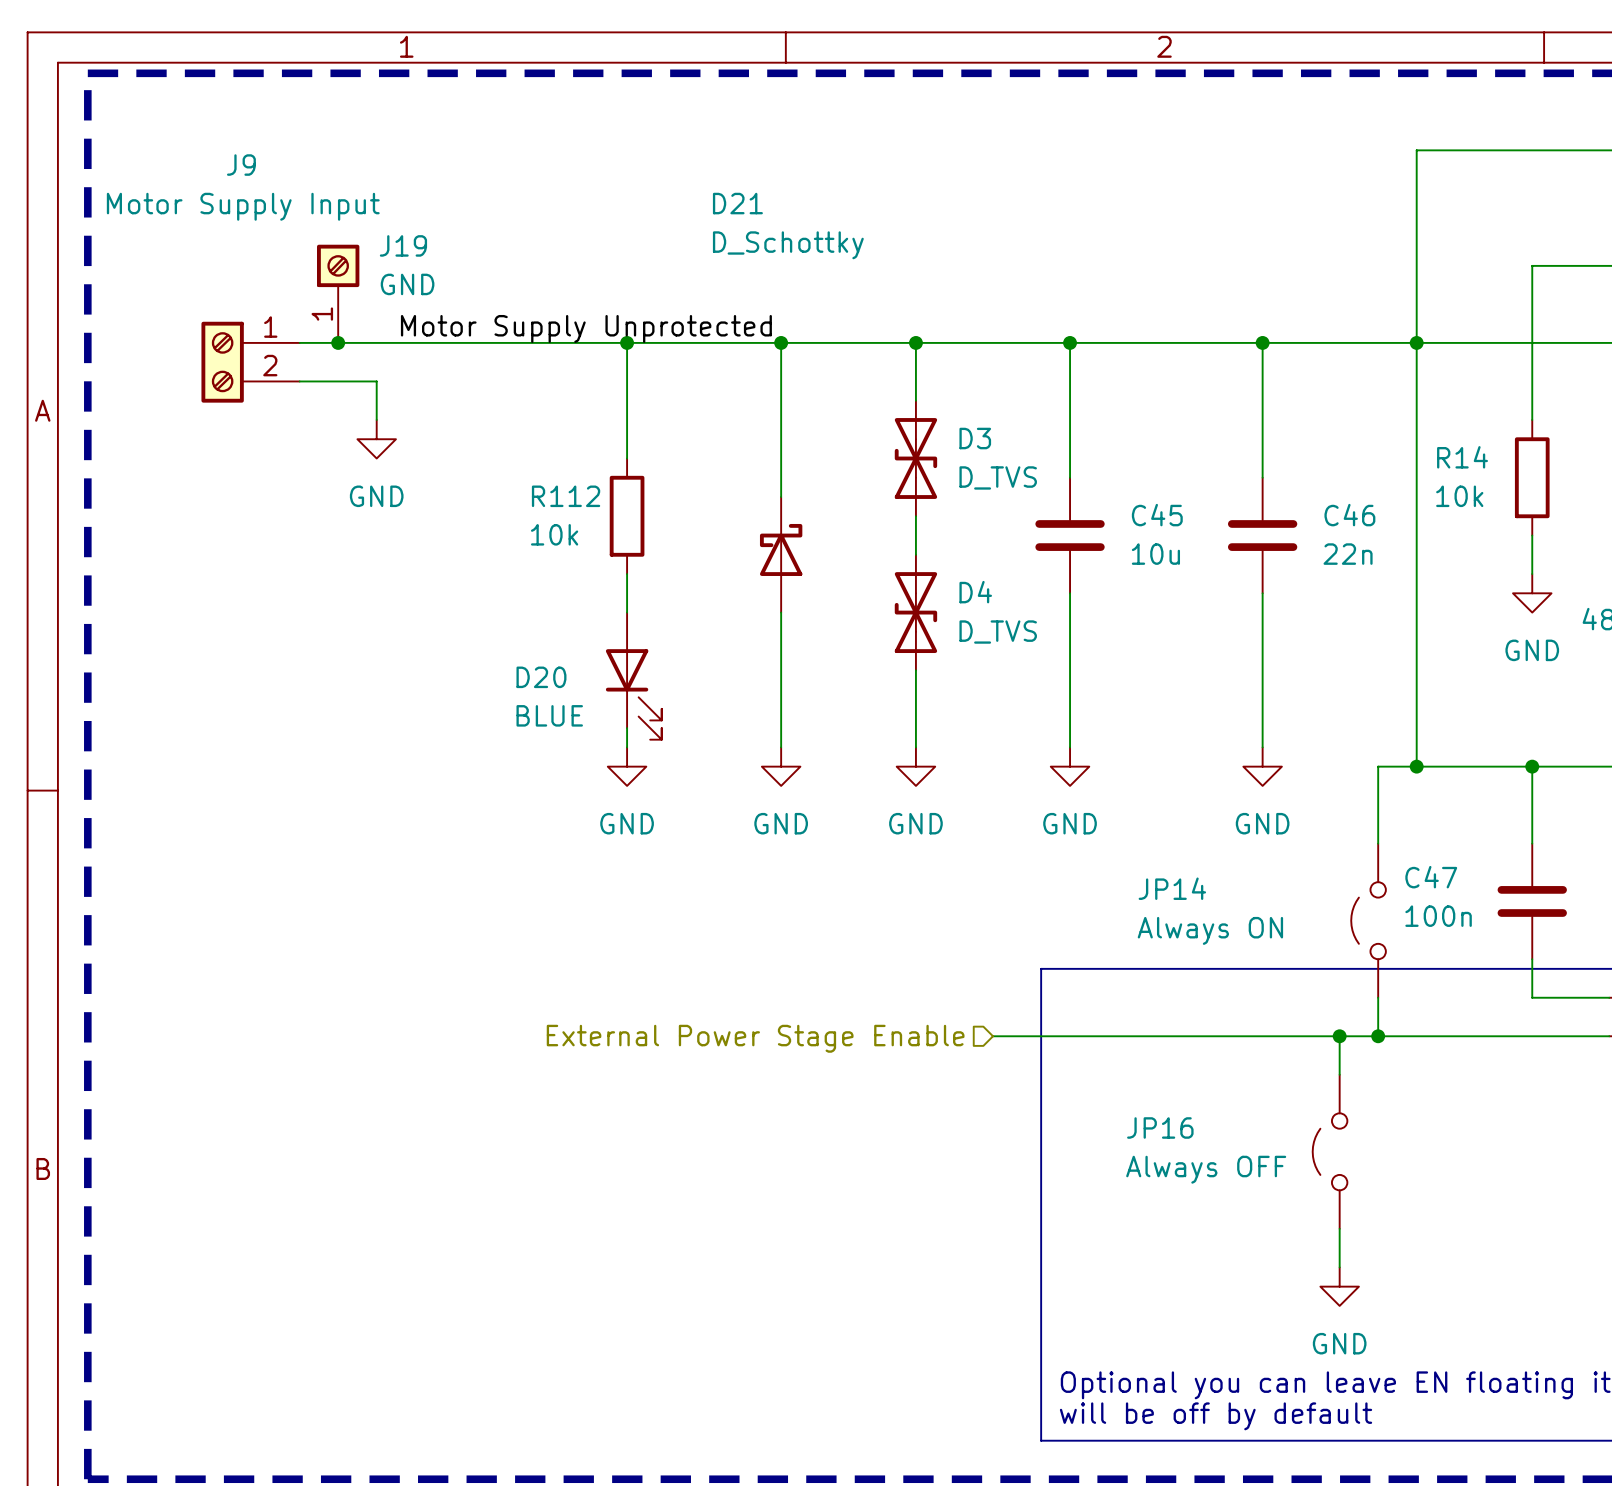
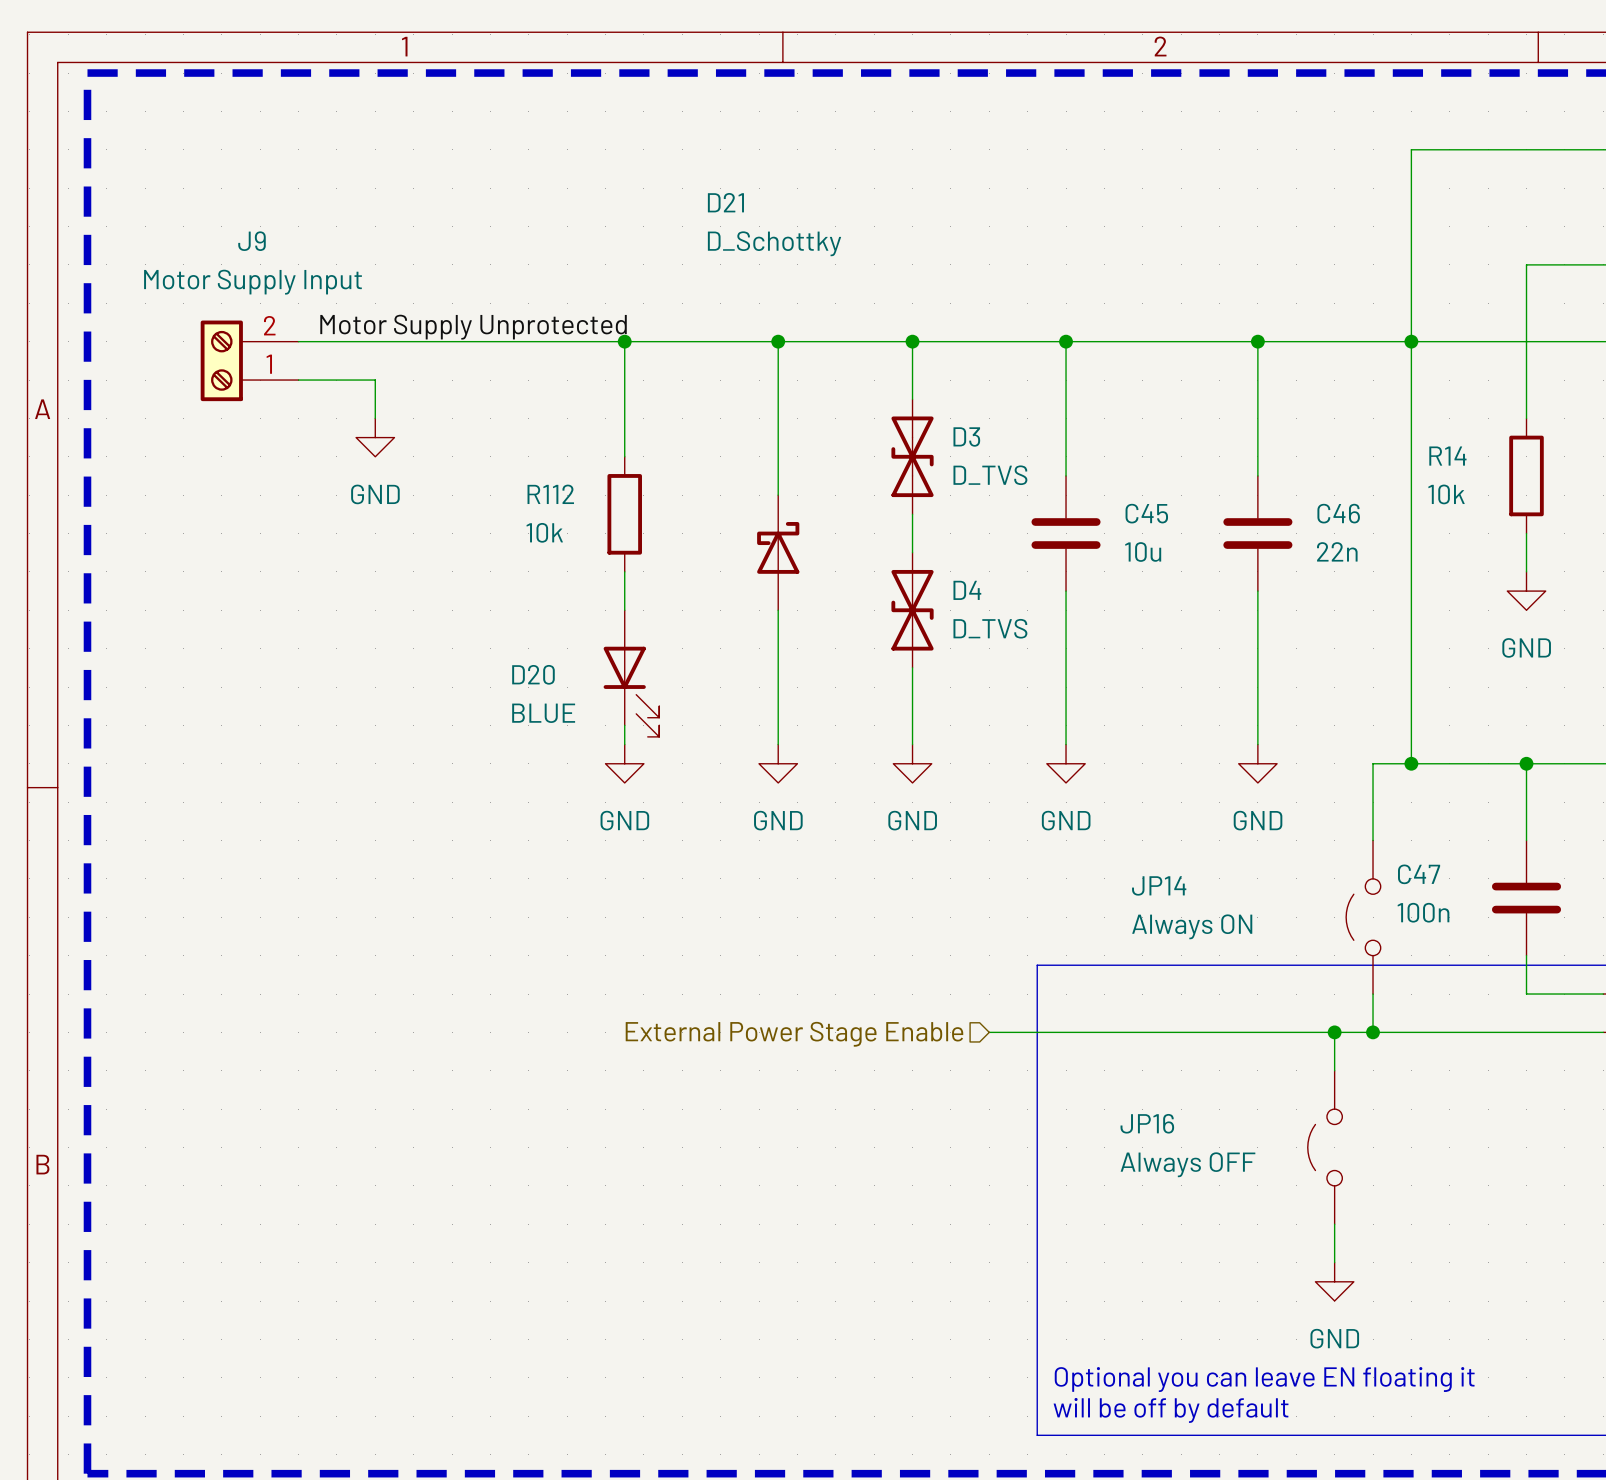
J9 name position: J9 (241, 165) -> J9 (252, 241)
J9 value position: Motor Supply Input (243, 206) -> Motor Supply Input (253, 282)
J19: GND (338, 293) -> none
label position: Motor Supply Unprotected (586, 328) -> Motor Supply Unprotected (473, 327)
junction: (338, 342) -> none
J9 flip: as is (222, 362) -> up-down (221, 360)

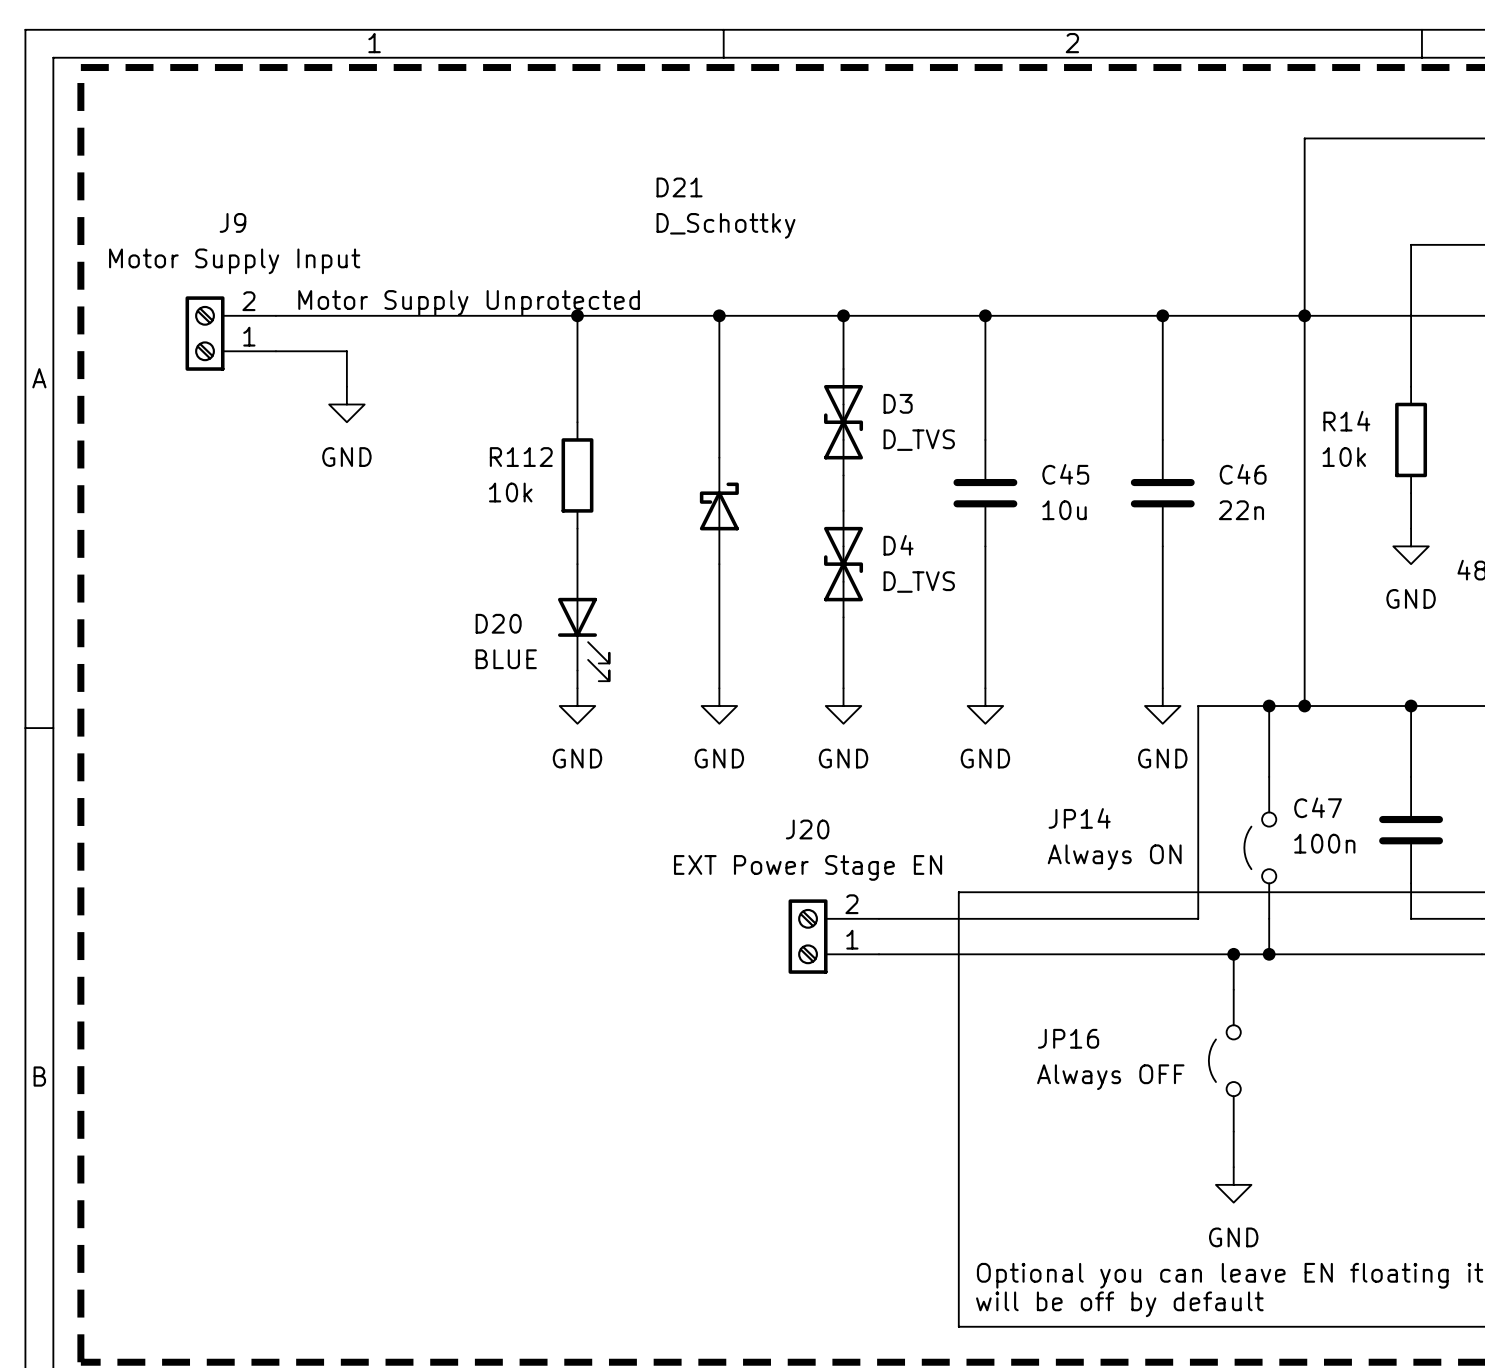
wire: none -> (1269, 706) (1198, 706) (1198, 918) (878, 918)
junction: none -> (1269, 706)
J20: none -> EXT Power Stage EN (833, 936)
wire: none -> (878, 954) (914, 954)
hierarchical label: External Power Stage Enable (794, 1034) -> none

